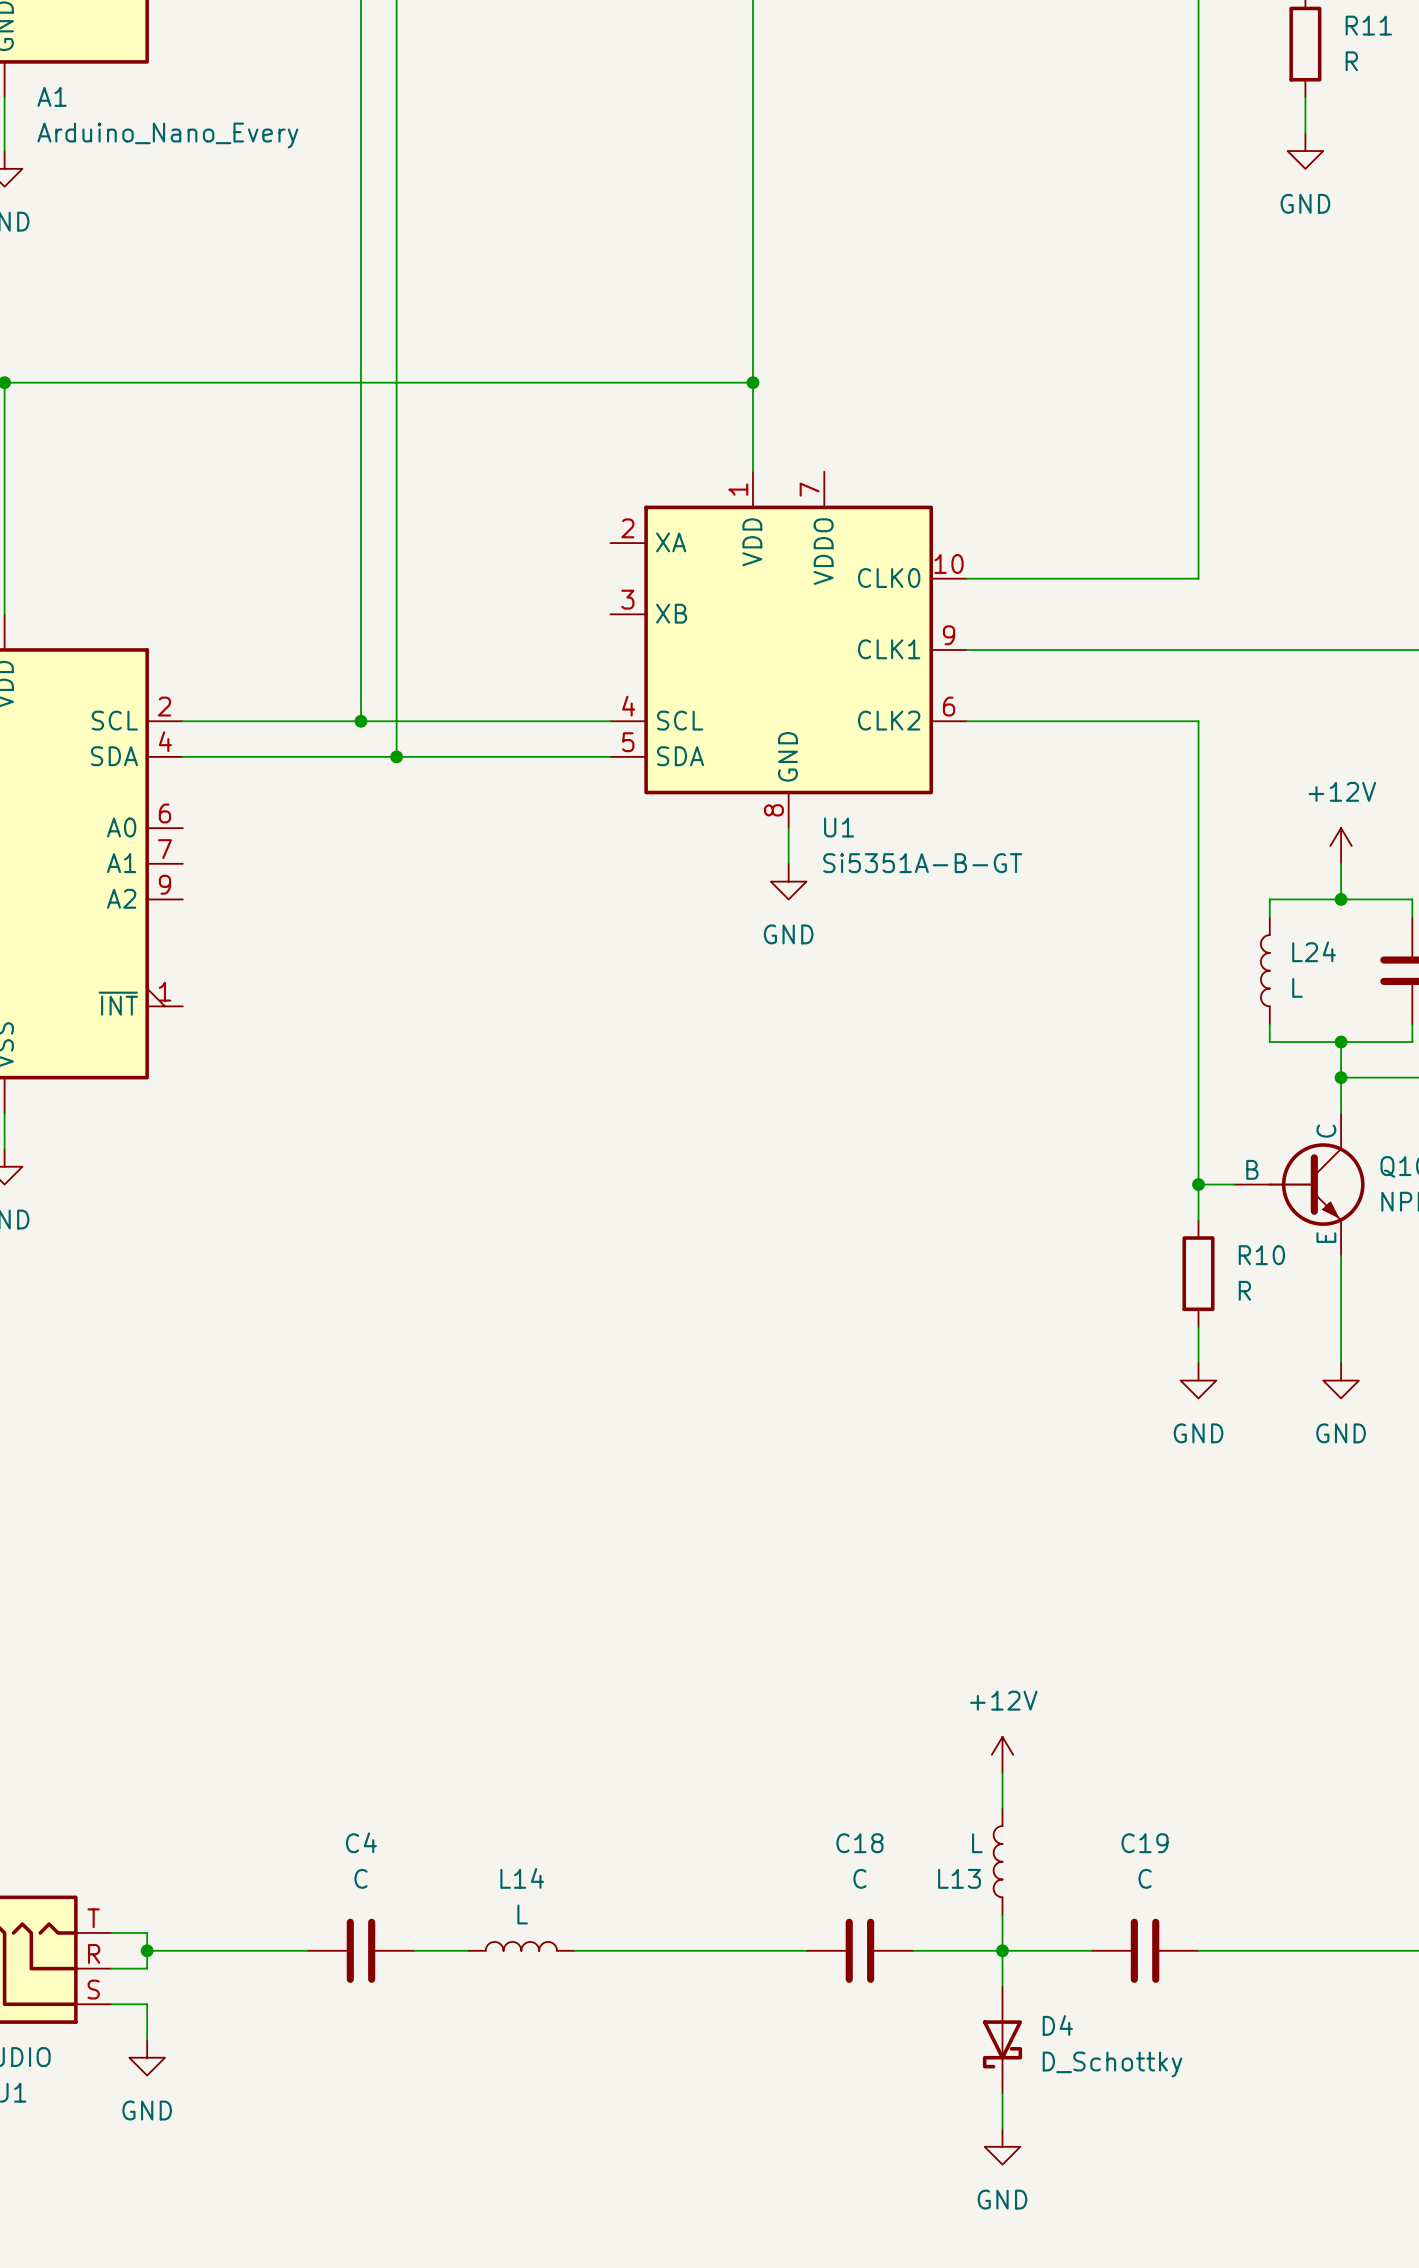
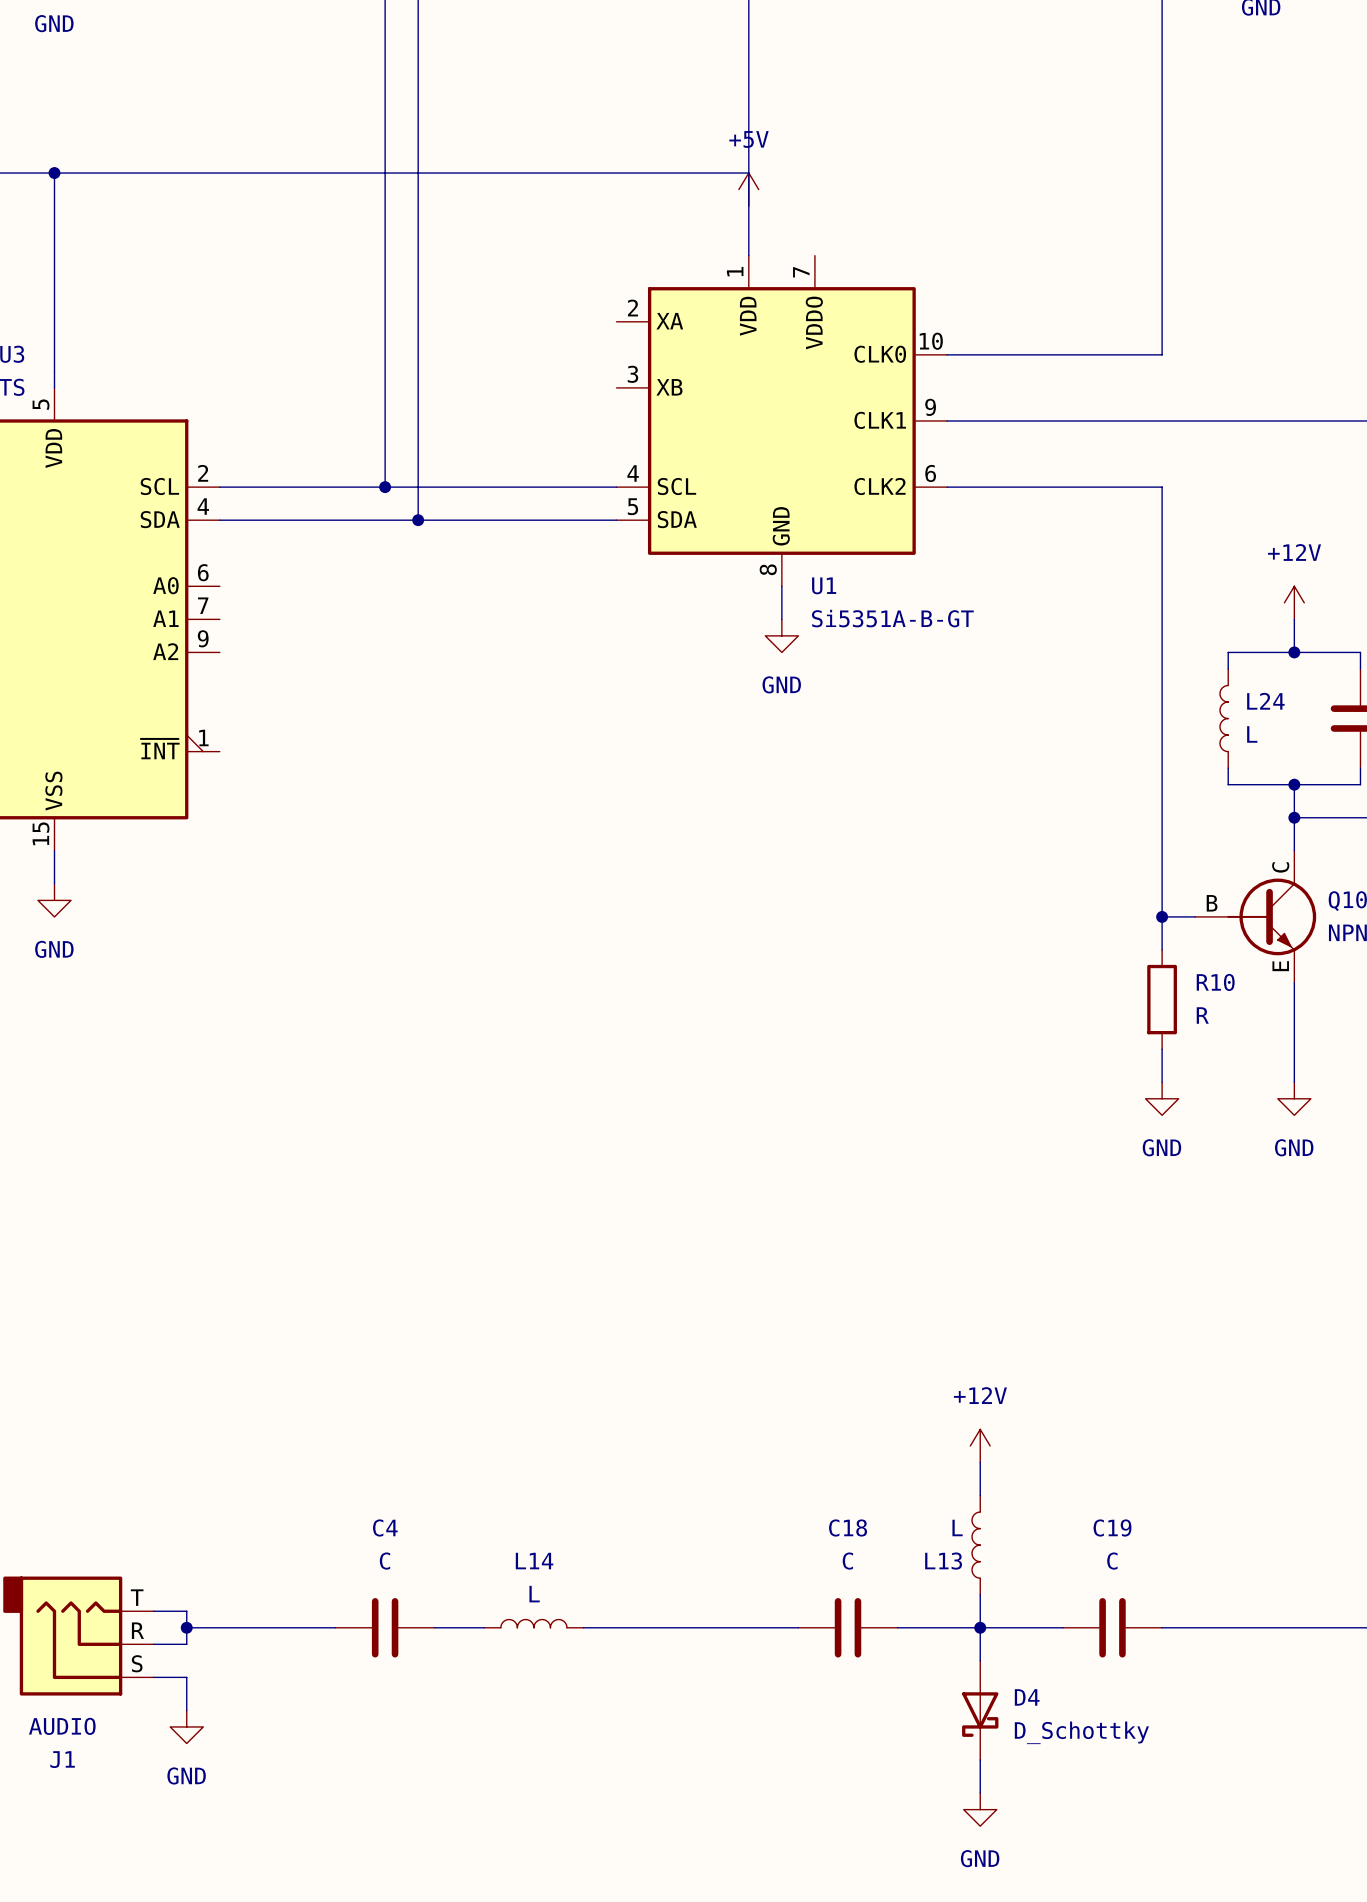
junction: (753, 382) -> none
power symbol: none -> +5V (748, 189)

